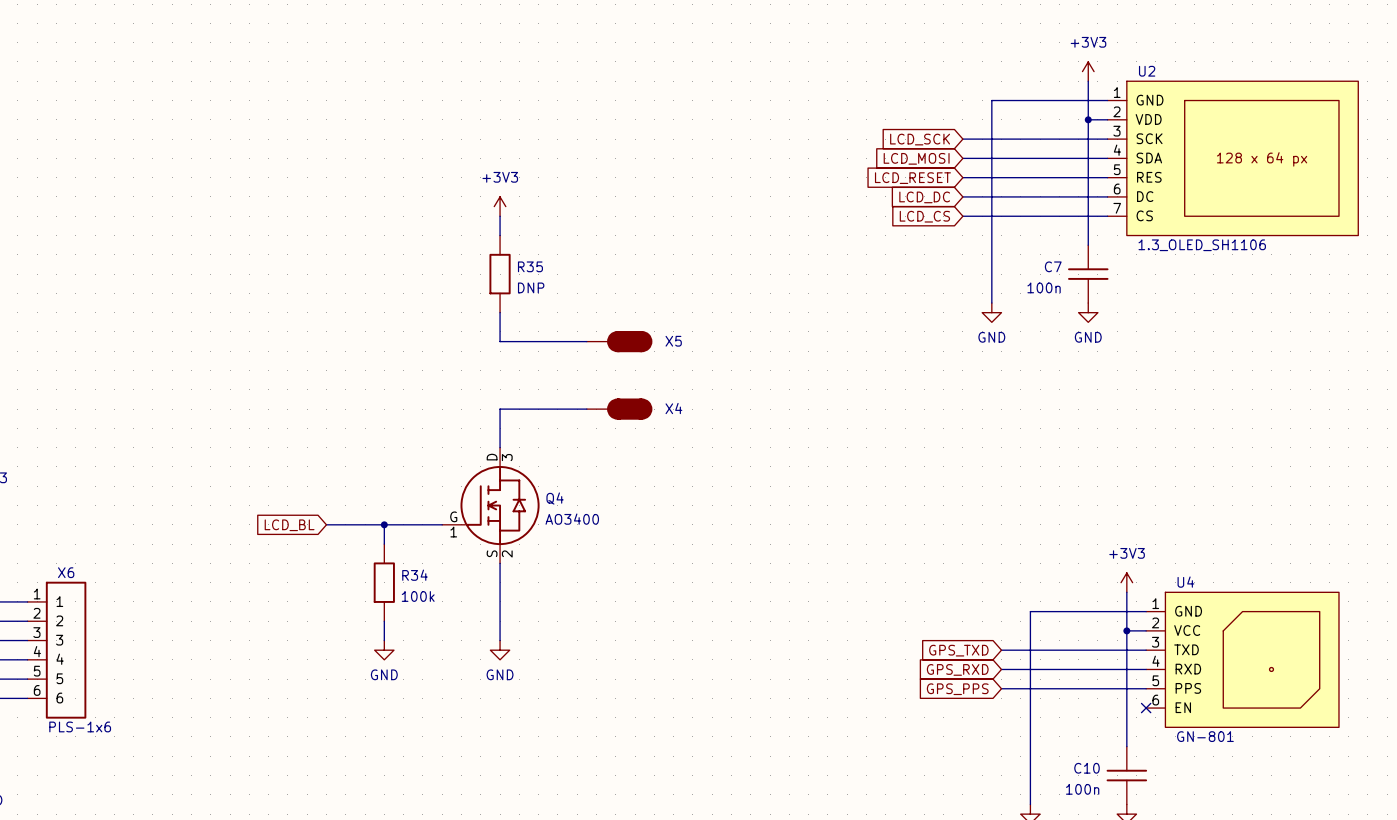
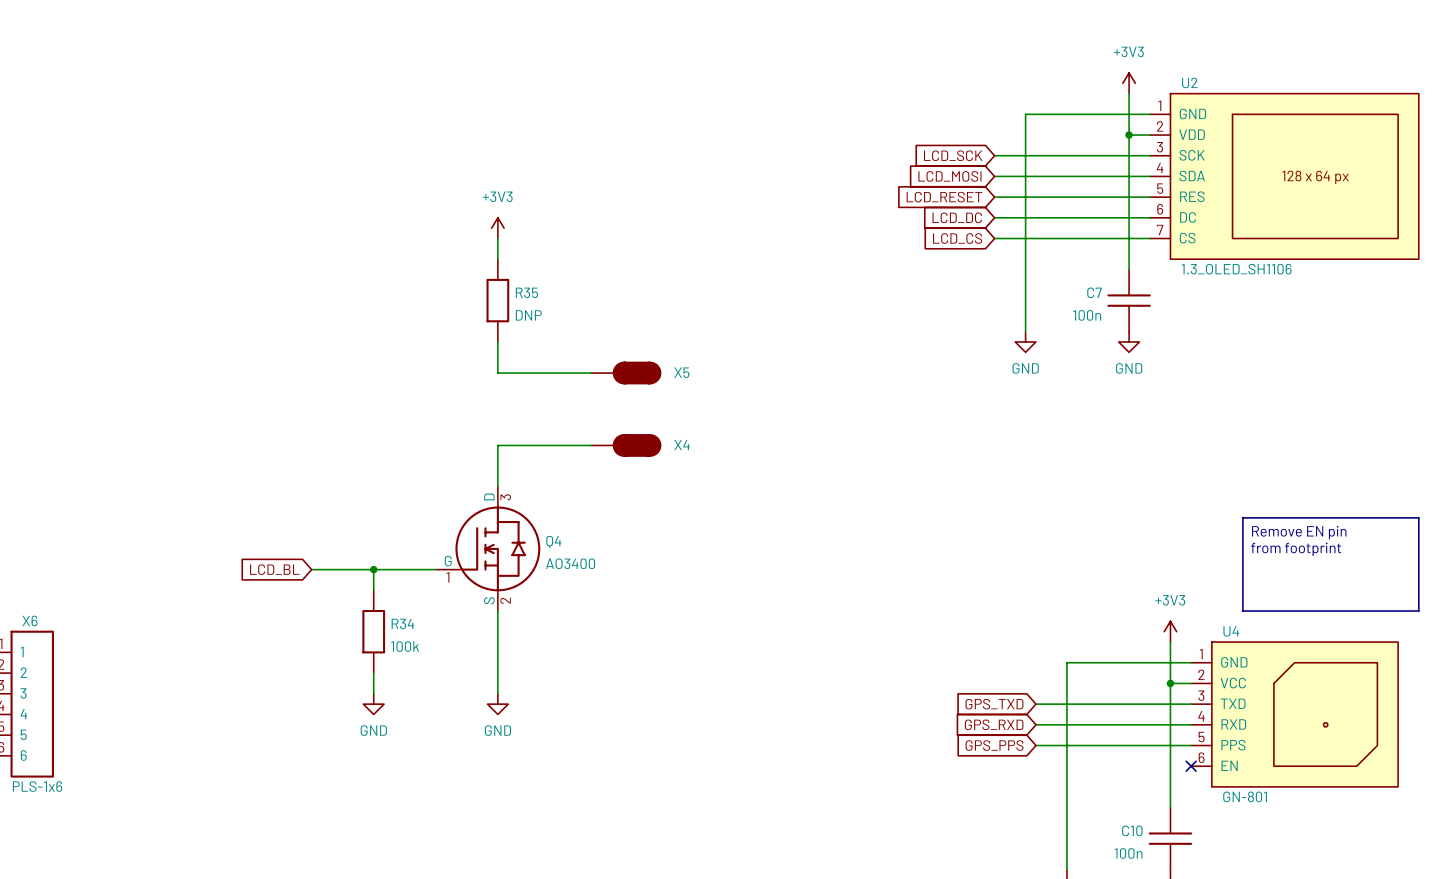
line: none -> (1242, 517) (1418, 517) (1418, 611) (1242, 611) (1242, 517)
text: none -> Remove EN pin (1299, 532)
text: none -> from footprint (1296, 549)

